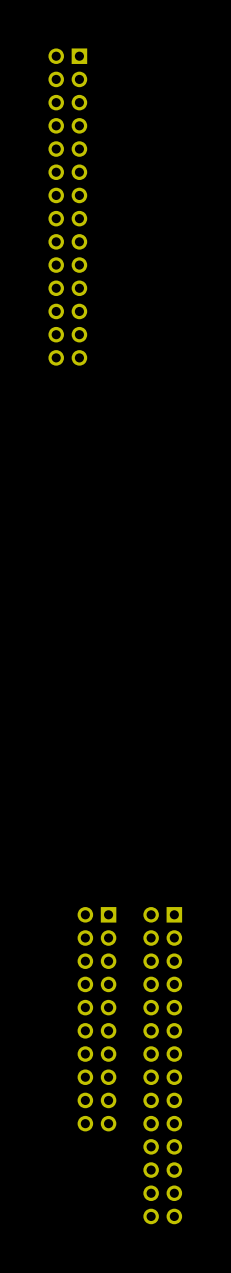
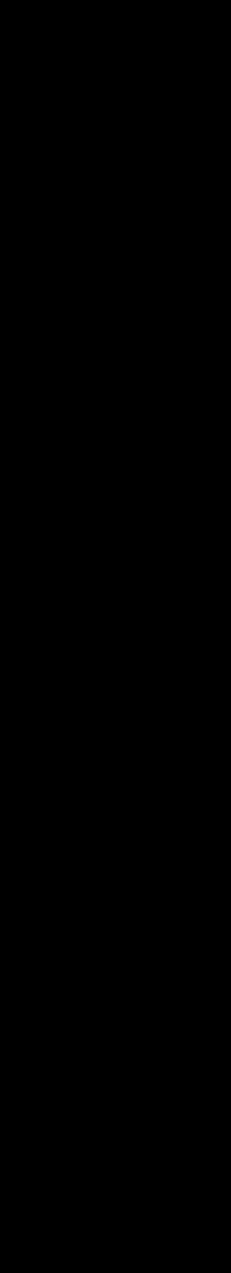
part: (67, 207) -> none
part: (96, 1019) -> none
part: (162, 1065) -> none

